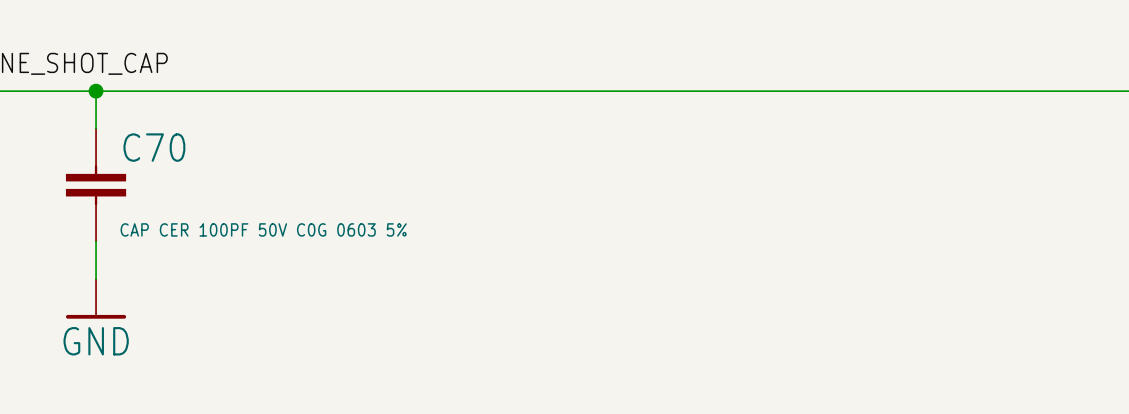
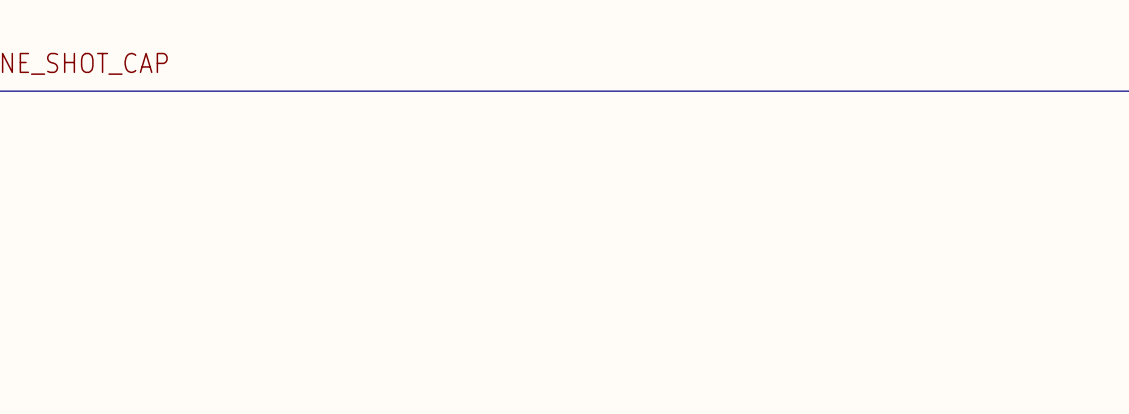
wire: (96, 91) (96, 128) -> none
junction: (96, 91) -> none
C70: CAP CER 100PF 50V C0G 0603 5% (96, 185) -> none
wire: (96, 241) (96, 279) -> none
power symbol: GND (96, 298) -> none

